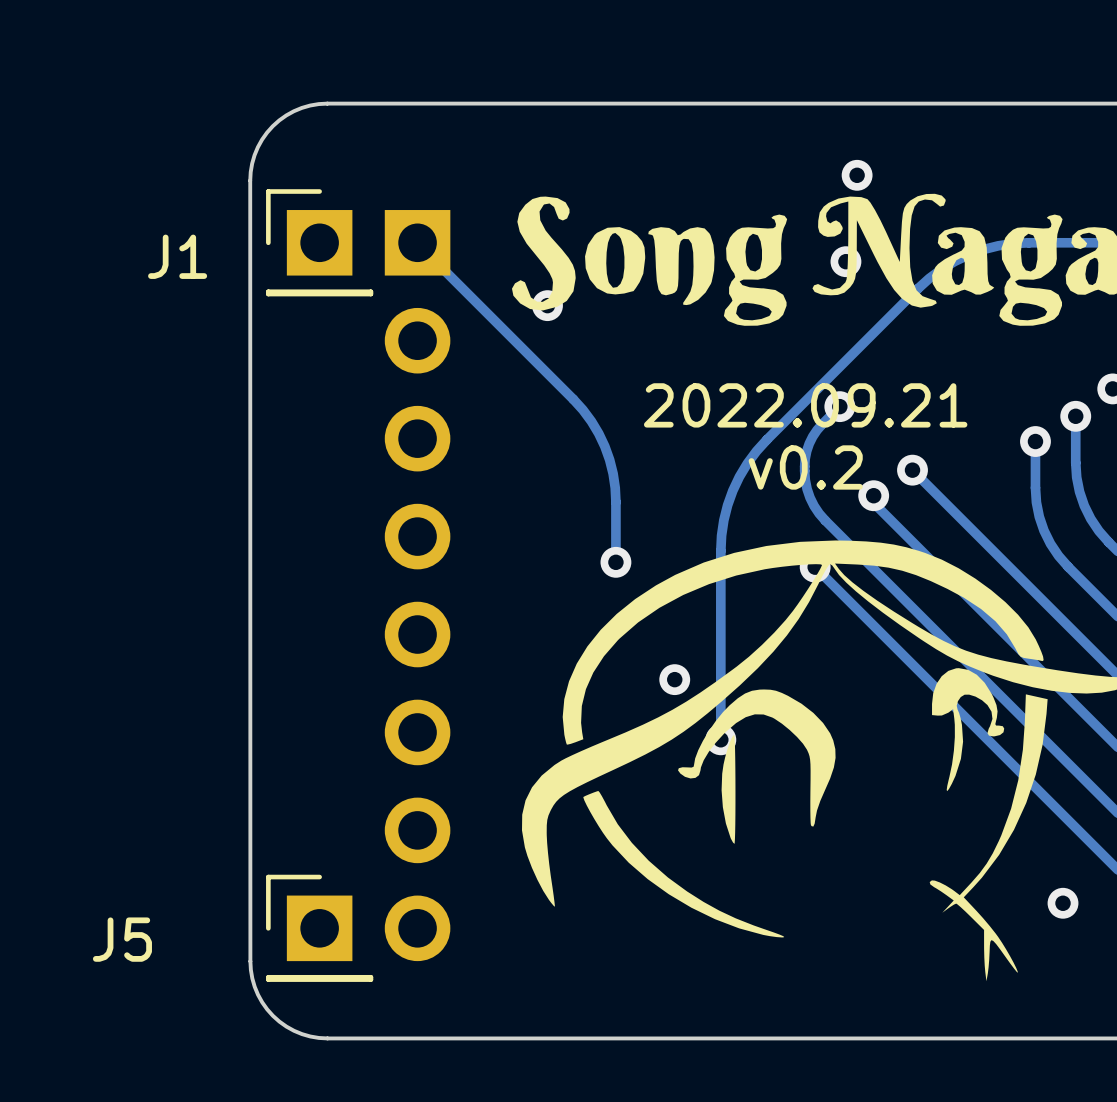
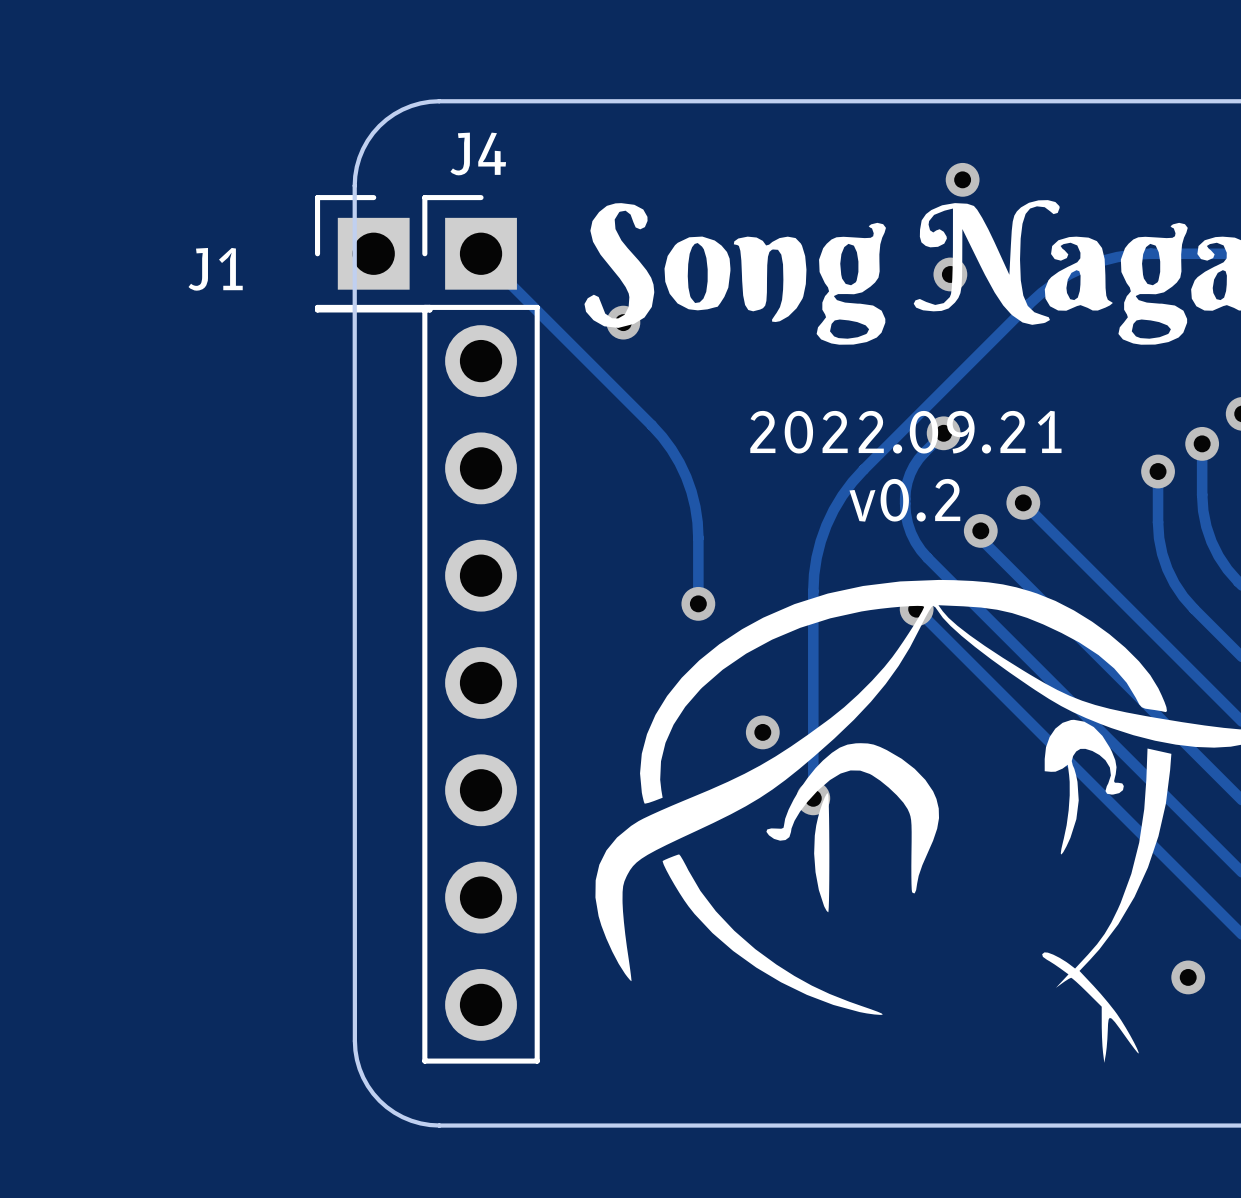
board edge: (379, 103) (318, 104) (301, 107) (286, 115) (267, 132) (257, 147) (252, 163) (250, 180) (250, 969) (254, 986) (267, 1009) (279, 1021) (294, 1030) (318, 1037) (379, 1038) -> (439, 101) (411, 106) (394, 114) (379, 126) (363, 149) (356, 166) (354, 185) (355, 1050) (363, 1077) (379, 1100) (402, 1117) (420, 1123) (439, 1125)
J4: none -> (481, 629)
J5: (319, 928) -> none

